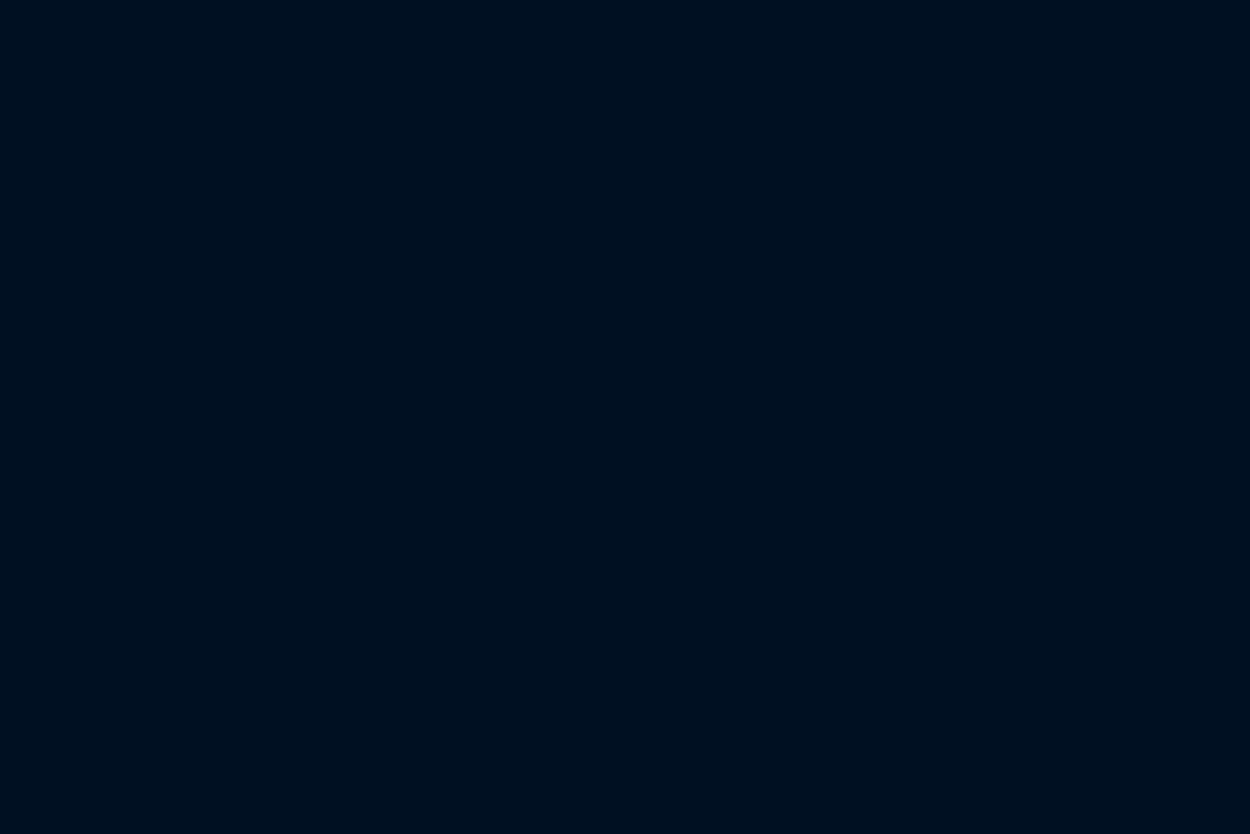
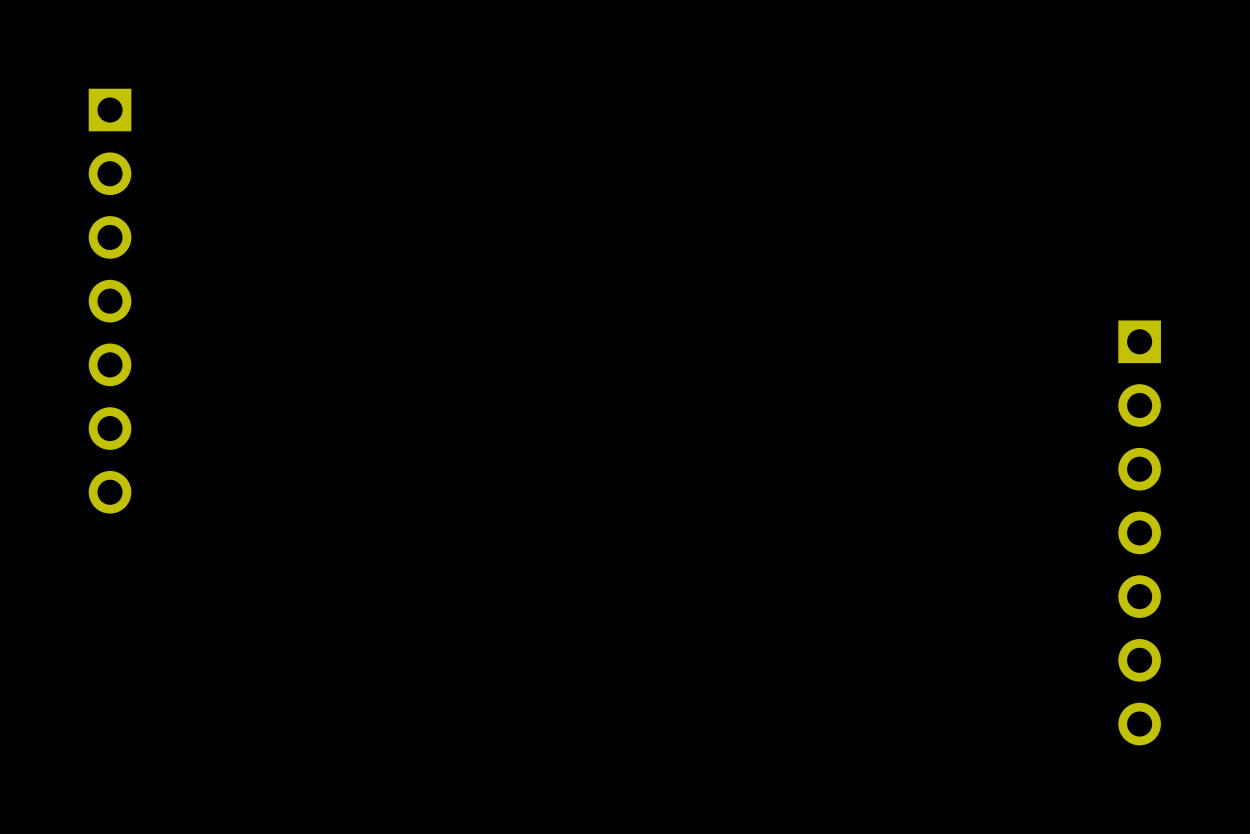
part: none -> (110, 301)
part: none -> (1139, 532)

